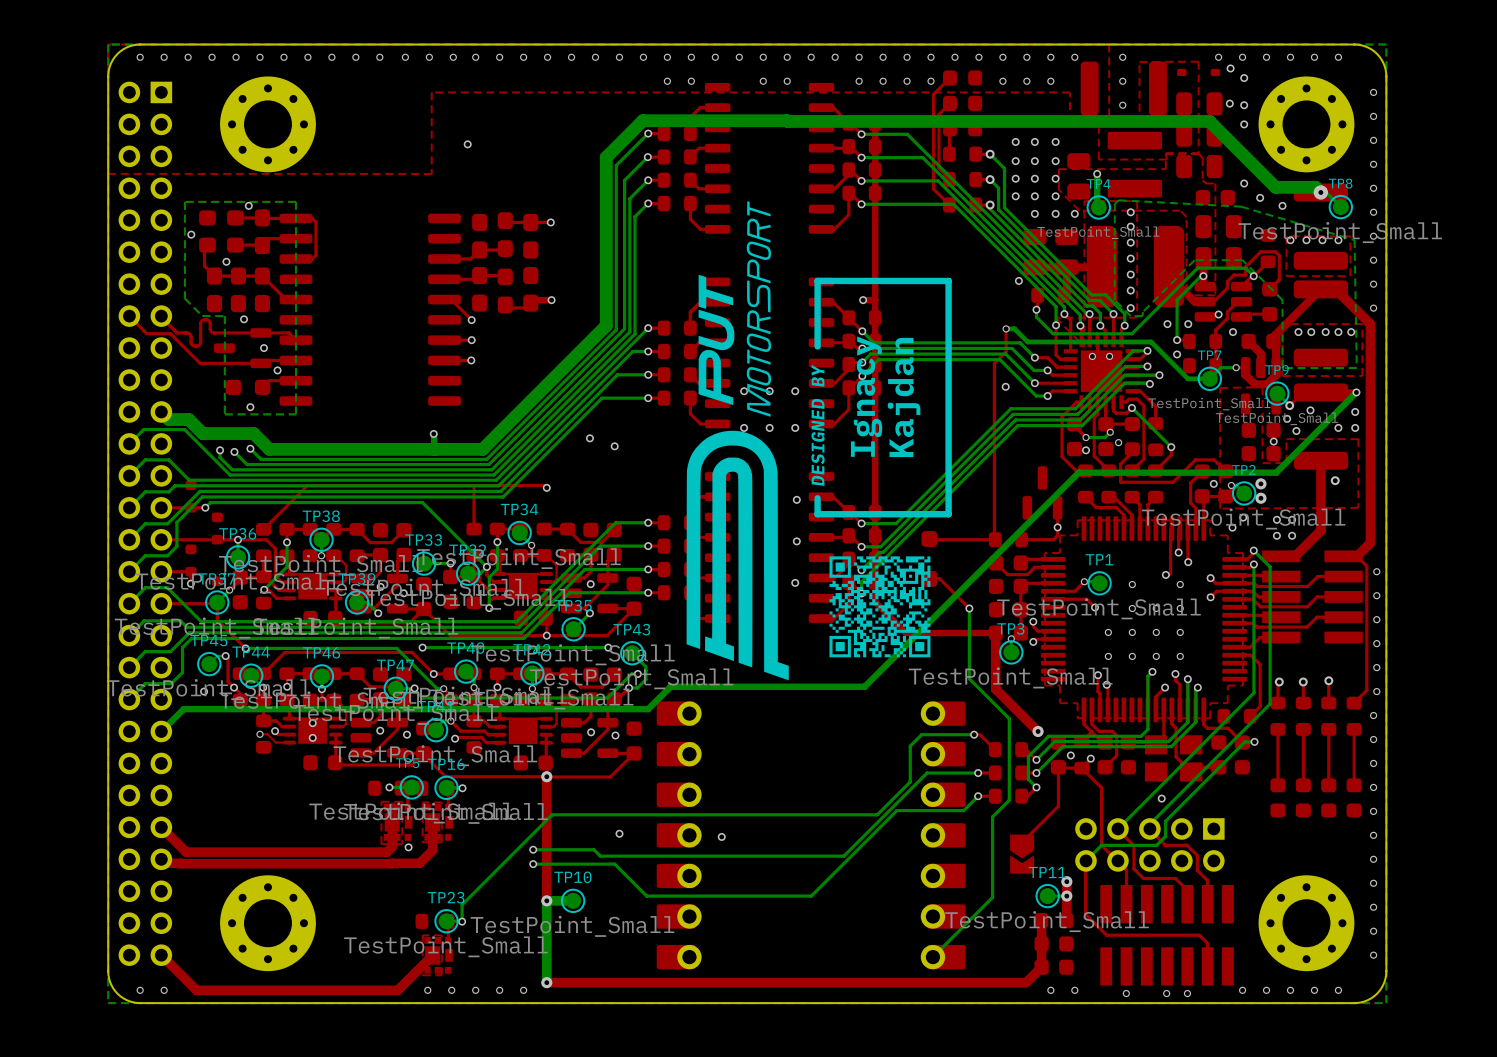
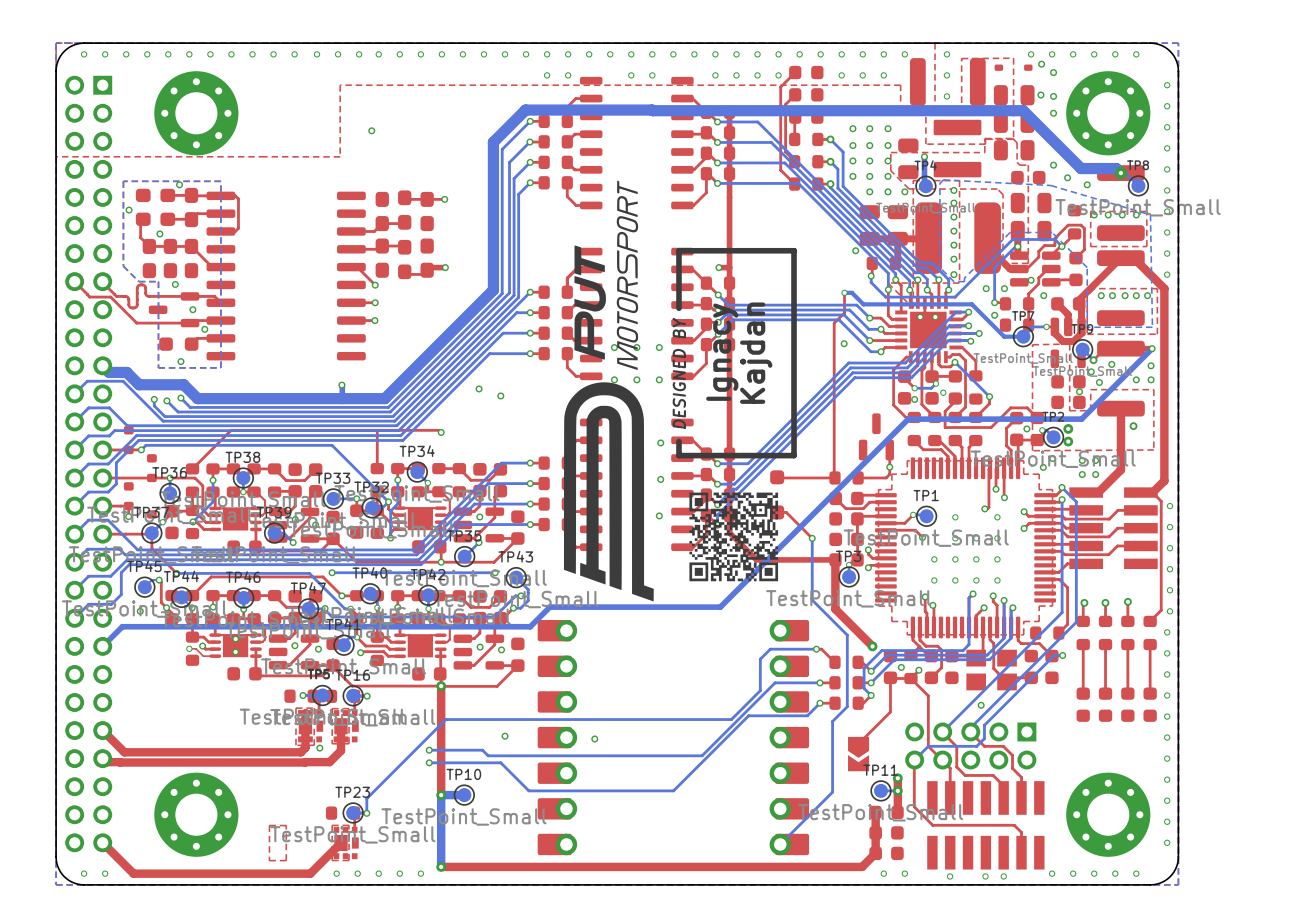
top zone outline: none -> (286, 825) (269, 825) (269, 860) (286, 860) (286, 825)

